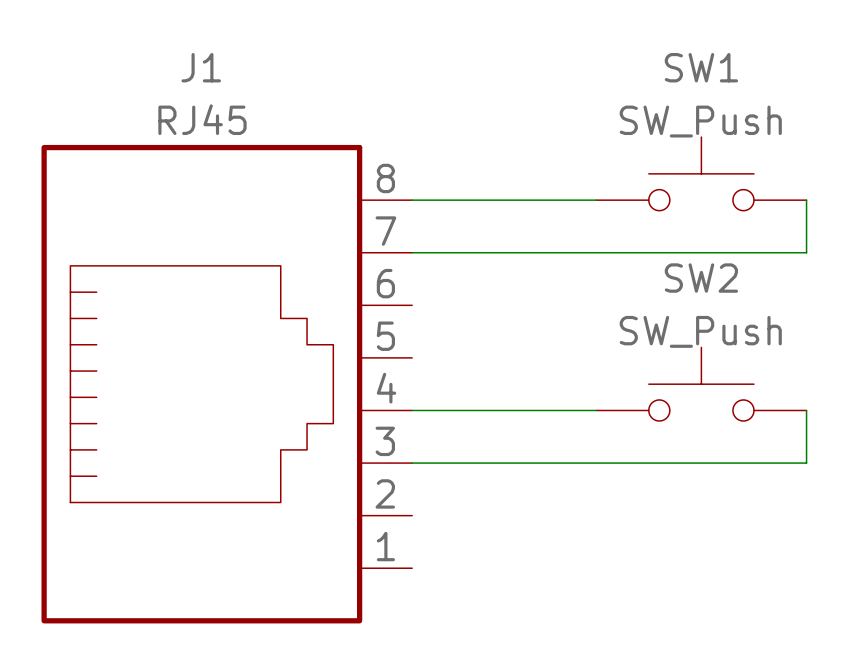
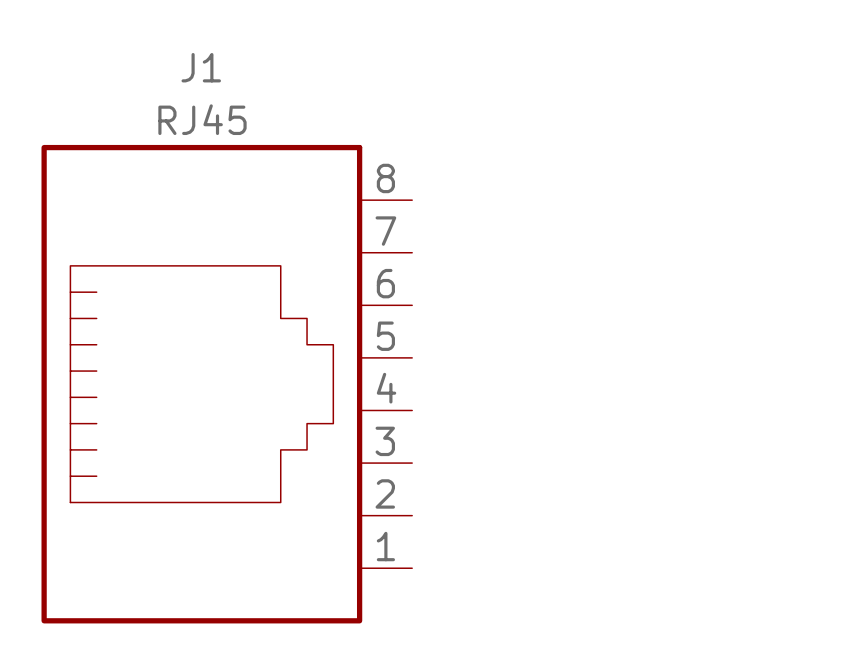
SW1: SW_Push (701, 173) -> none
wire: (412, 200) (596, 200) -> none
wire: (806, 200) (806, 252) (412, 252) -> none
SW2: SW_Push (701, 384) -> none
wire: (412, 410) (596, 410) -> none
wire: (806, 410) (806, 463) (412, 463) -> none

